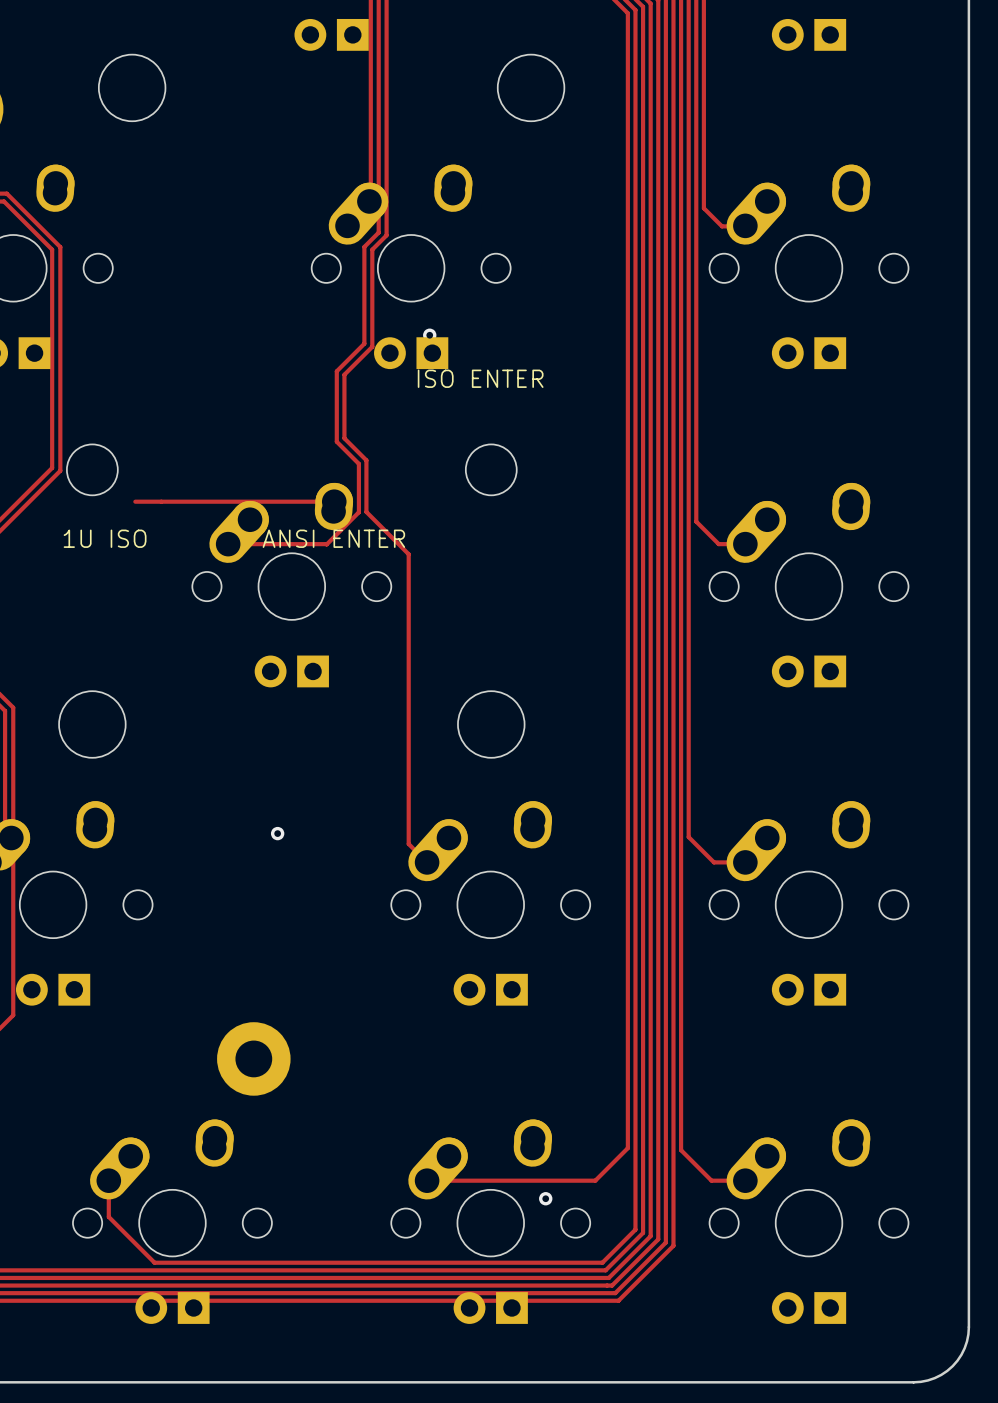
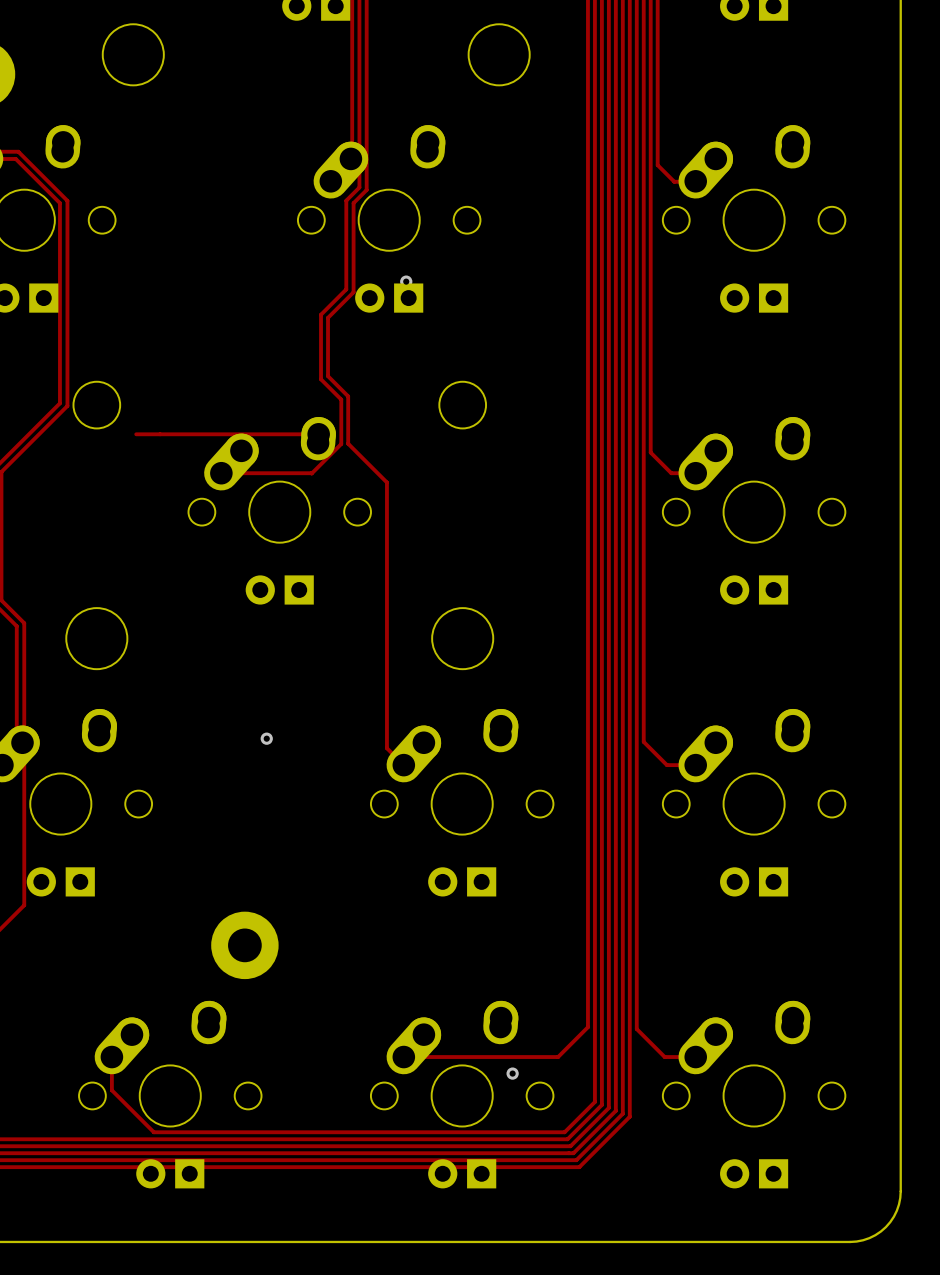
text: ISO ENTER (480, 378) -> none
text: 1U ISO (105, 538) -> none
text: ANSI ENTER (333, 538) -> none

